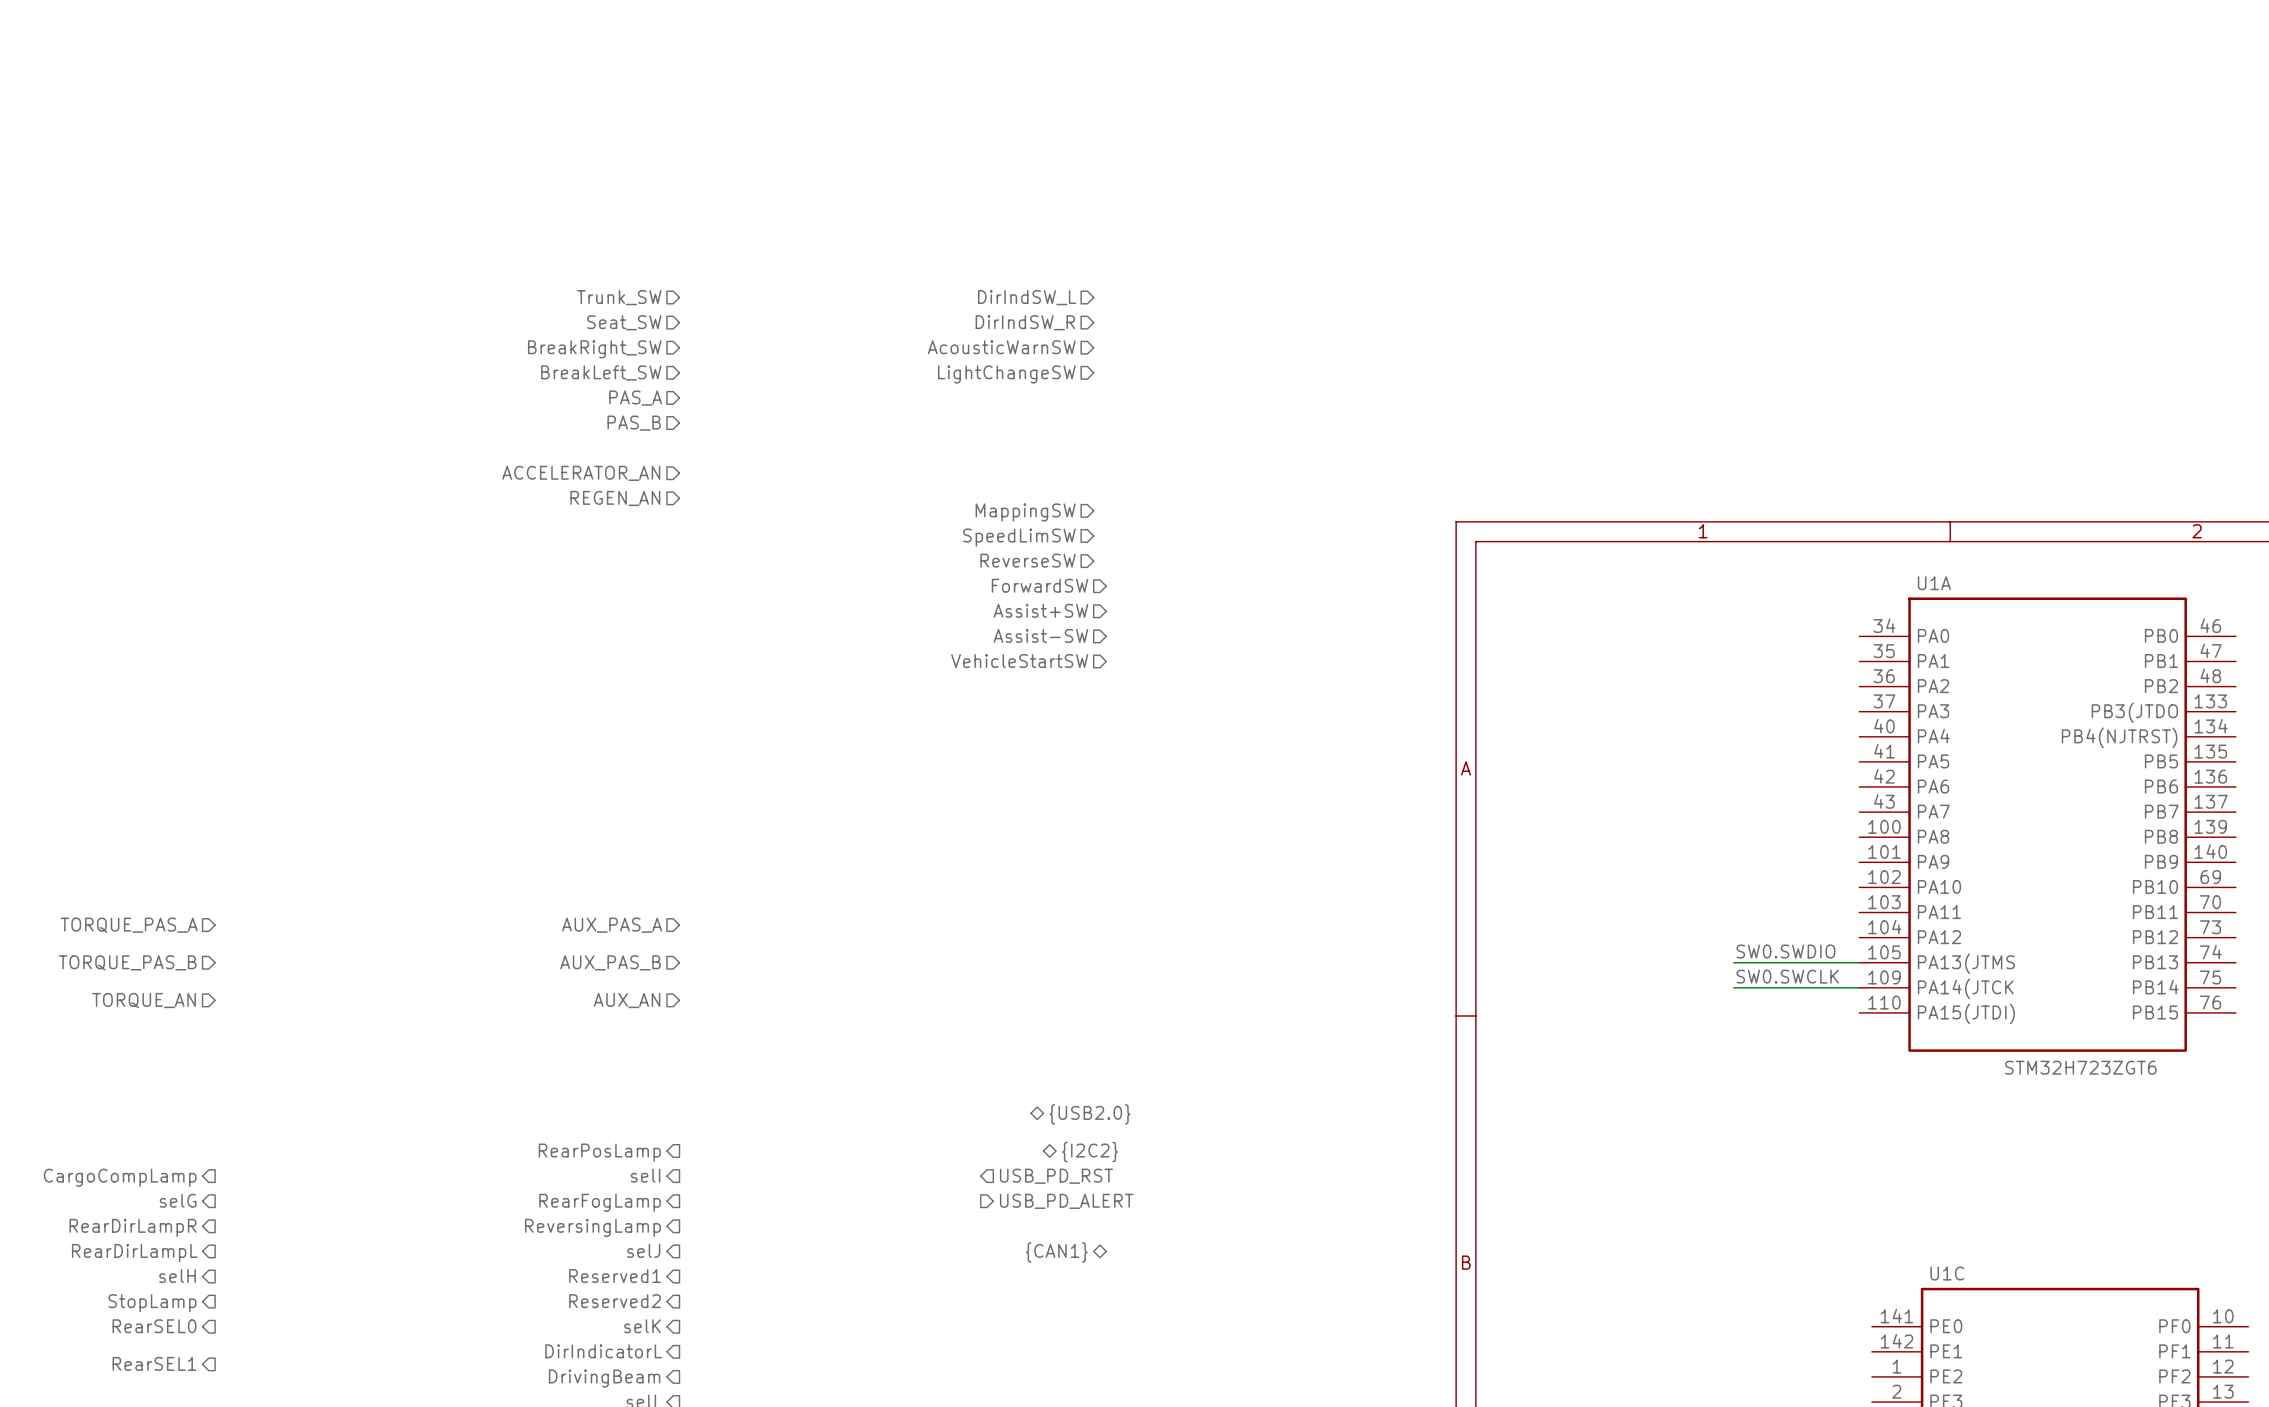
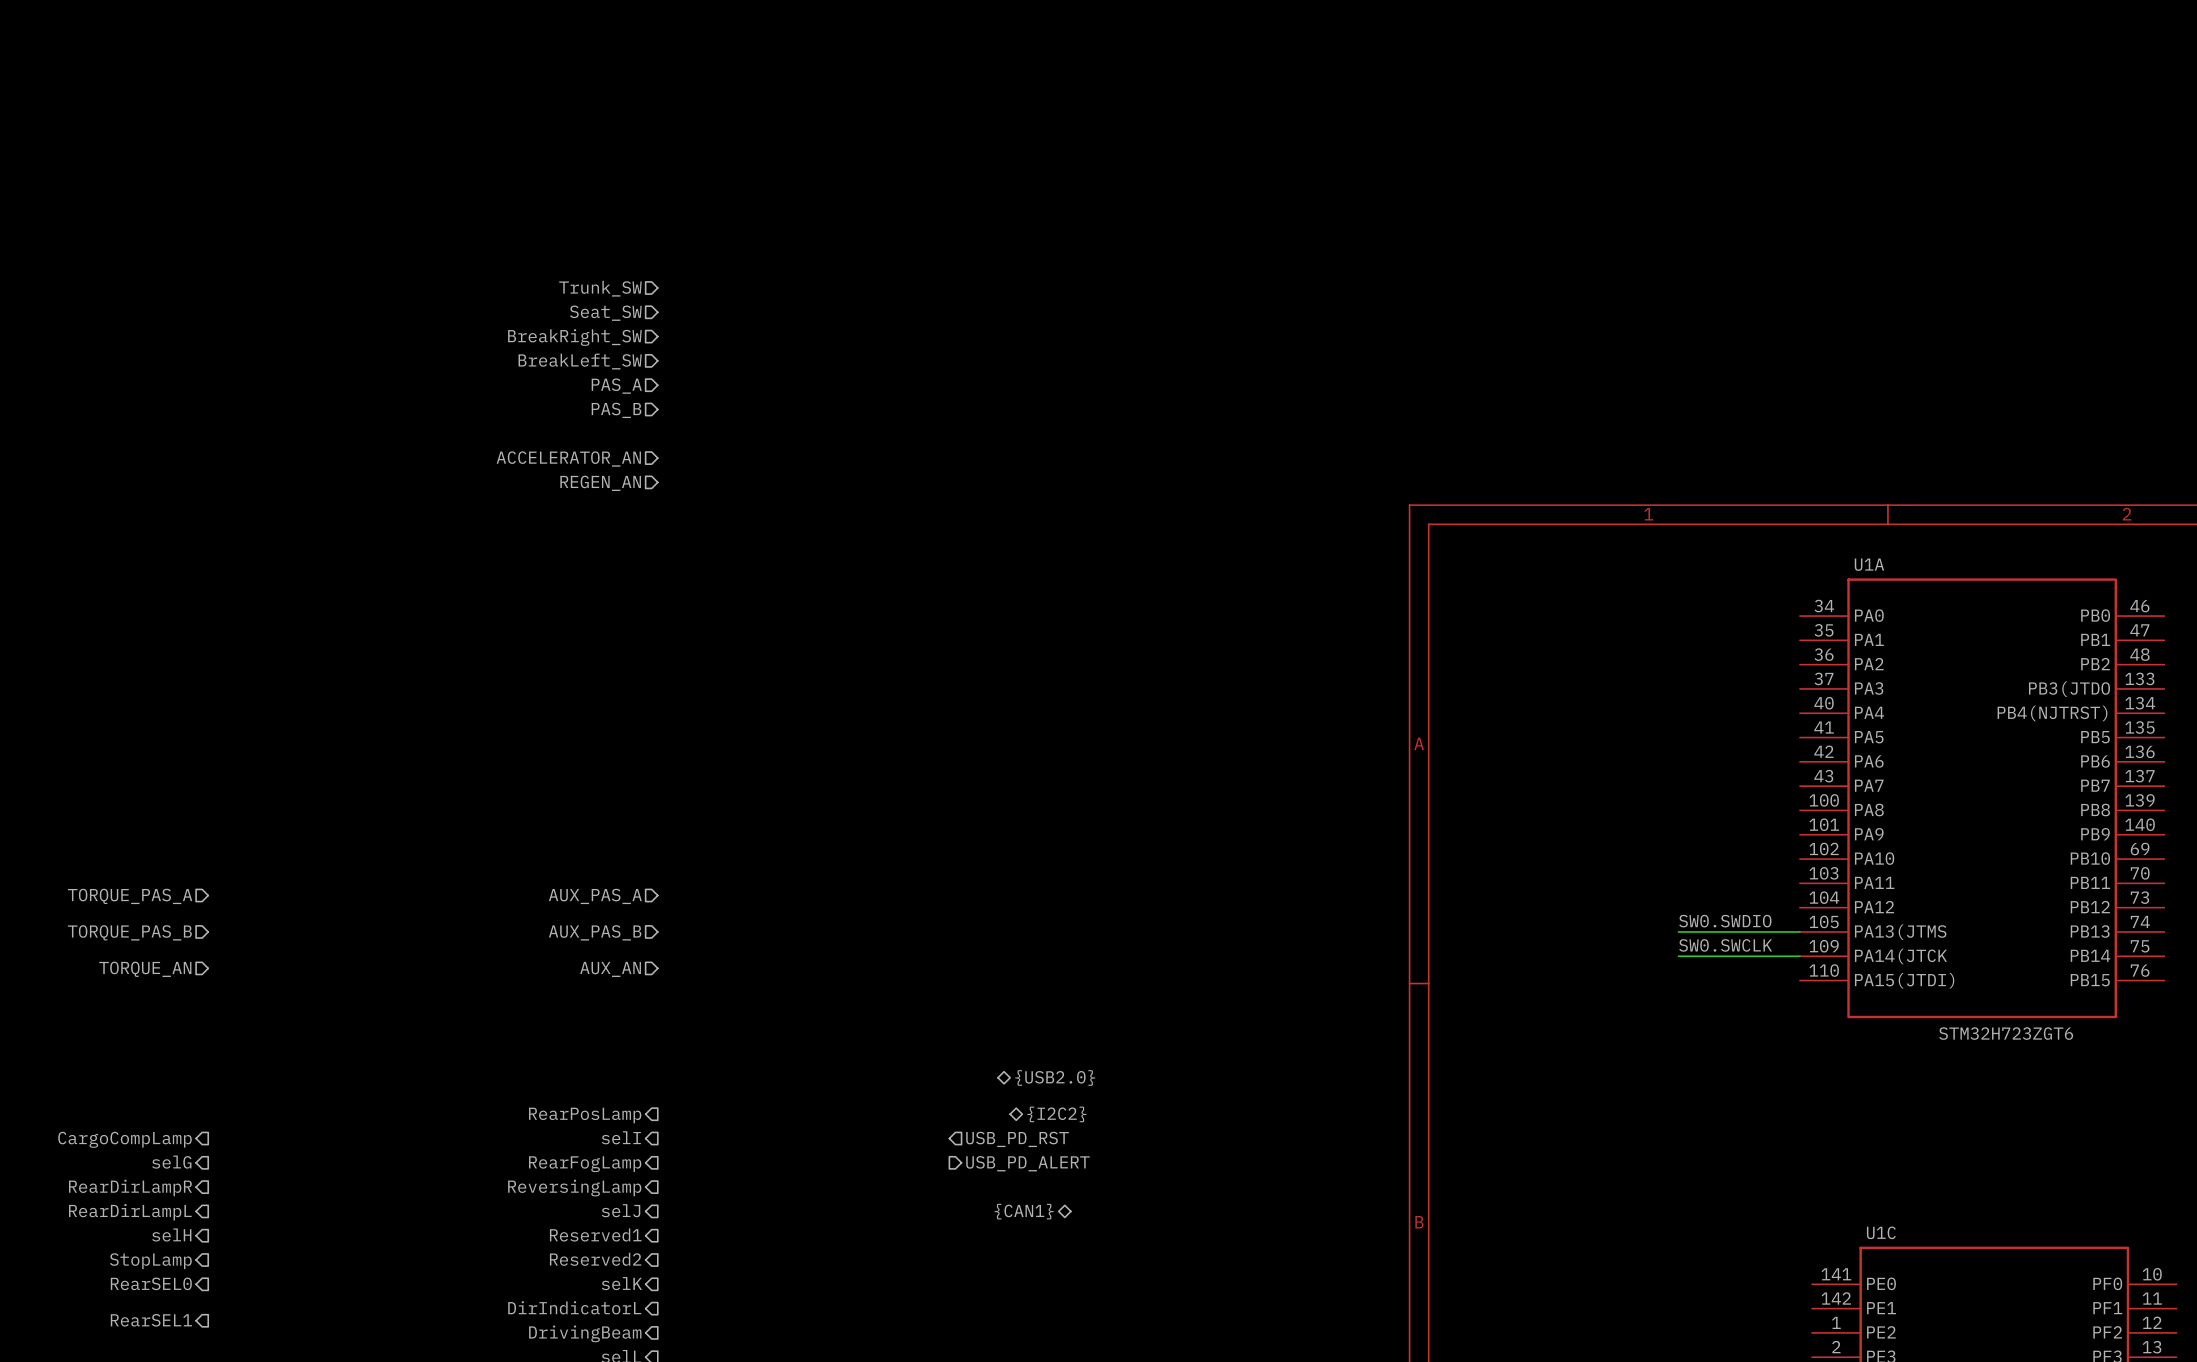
hierarchical label: DirIndSW_L (1027, 297) -> none
hierarchical label: DirIndSW_R (1025, 322) -> none
hierarchical label: AcousticWarnSW (1001, 347) -> none
hierarchical label: LightChangeSW (1006, 374) -> none
hierarchical label: MappingSW (1025, 512) -> none
hierarchical label: SpeedLimSW (1019, 537) -> none
hierarchical label: ReverseSW (1028, 560) -> none
hierarchical label: ForwardSW (1040, 585) -> none
hierarchical label: Assist+SW (1040, 610) -> none
hierarchical label: Assist-SW (1040, 635) -> none
hierarchical label: VehicleStartSW (1019, 661) -> none

